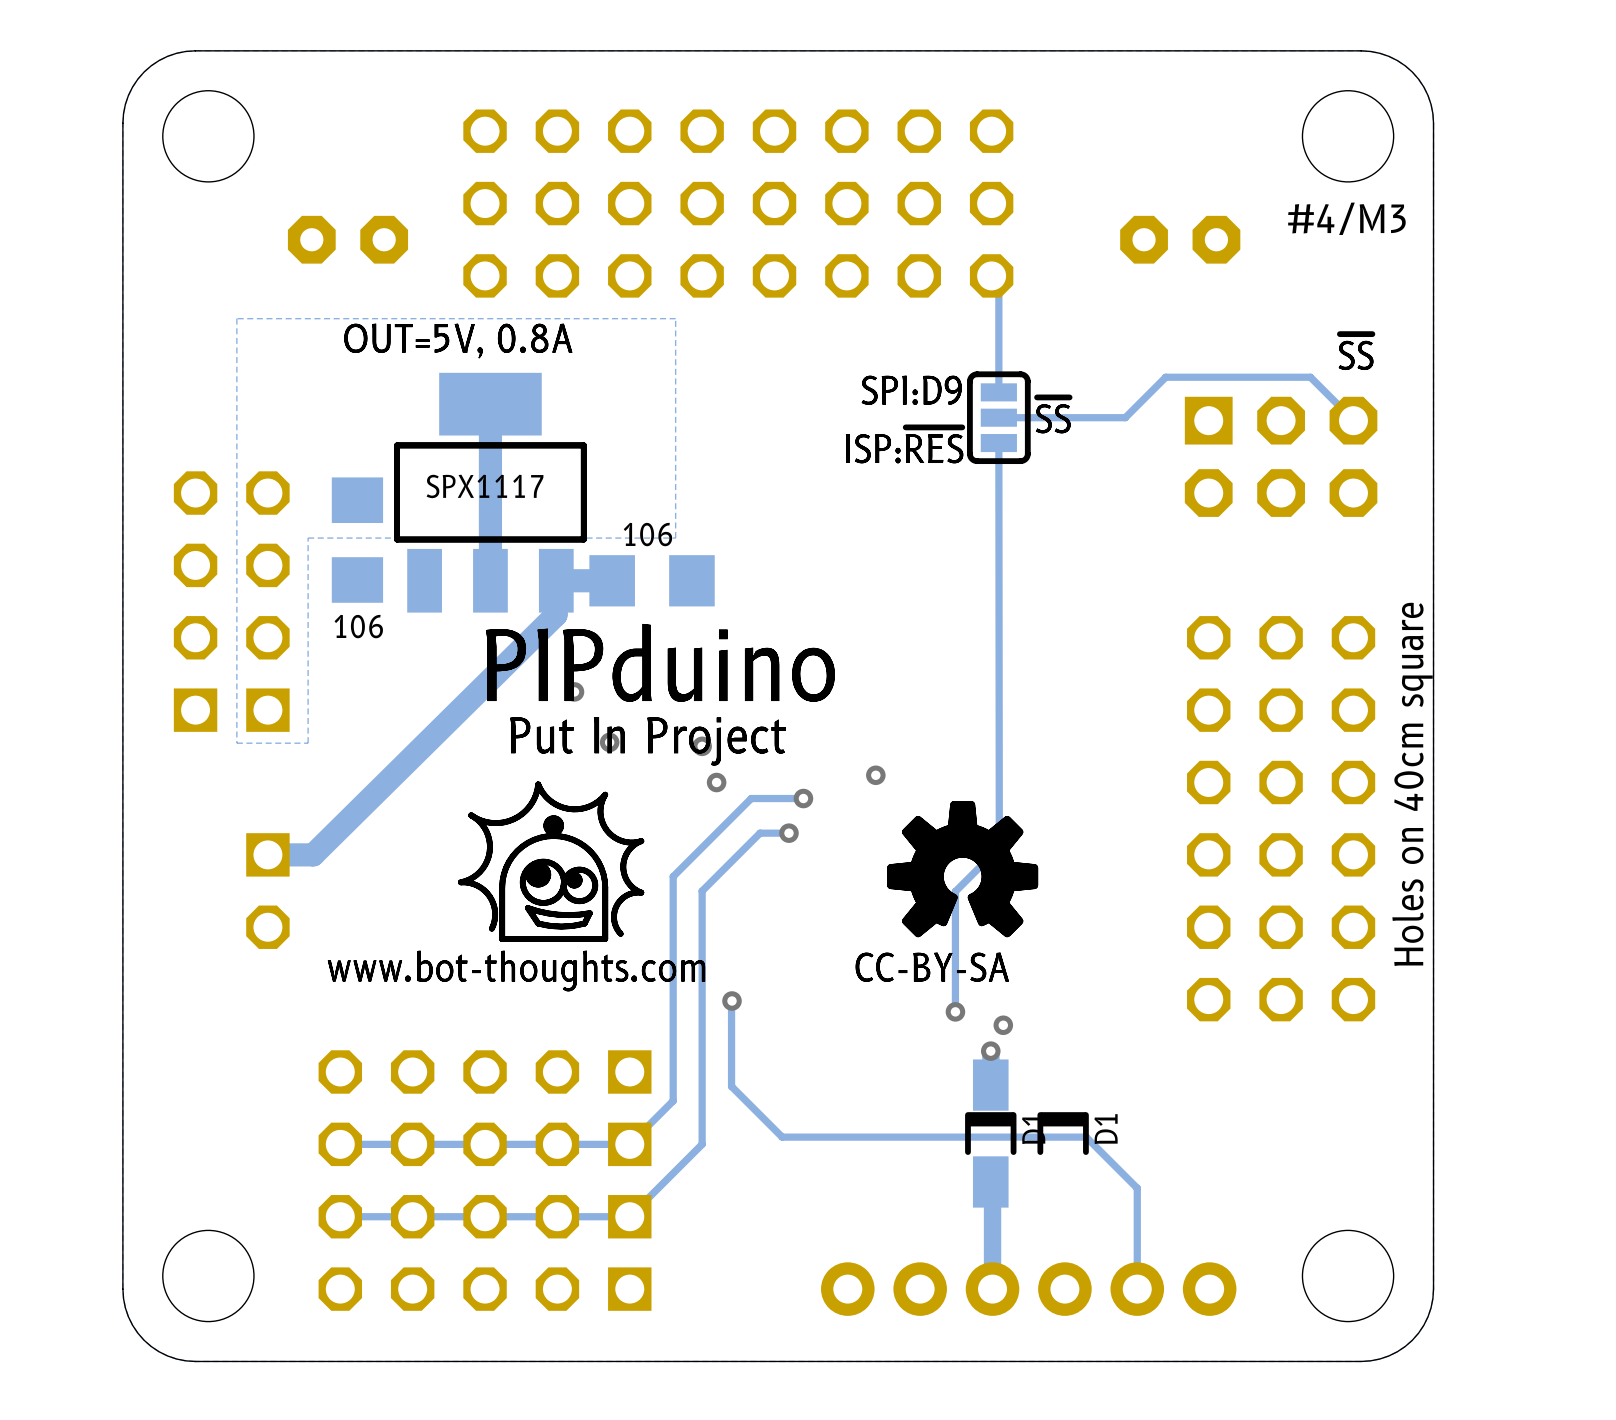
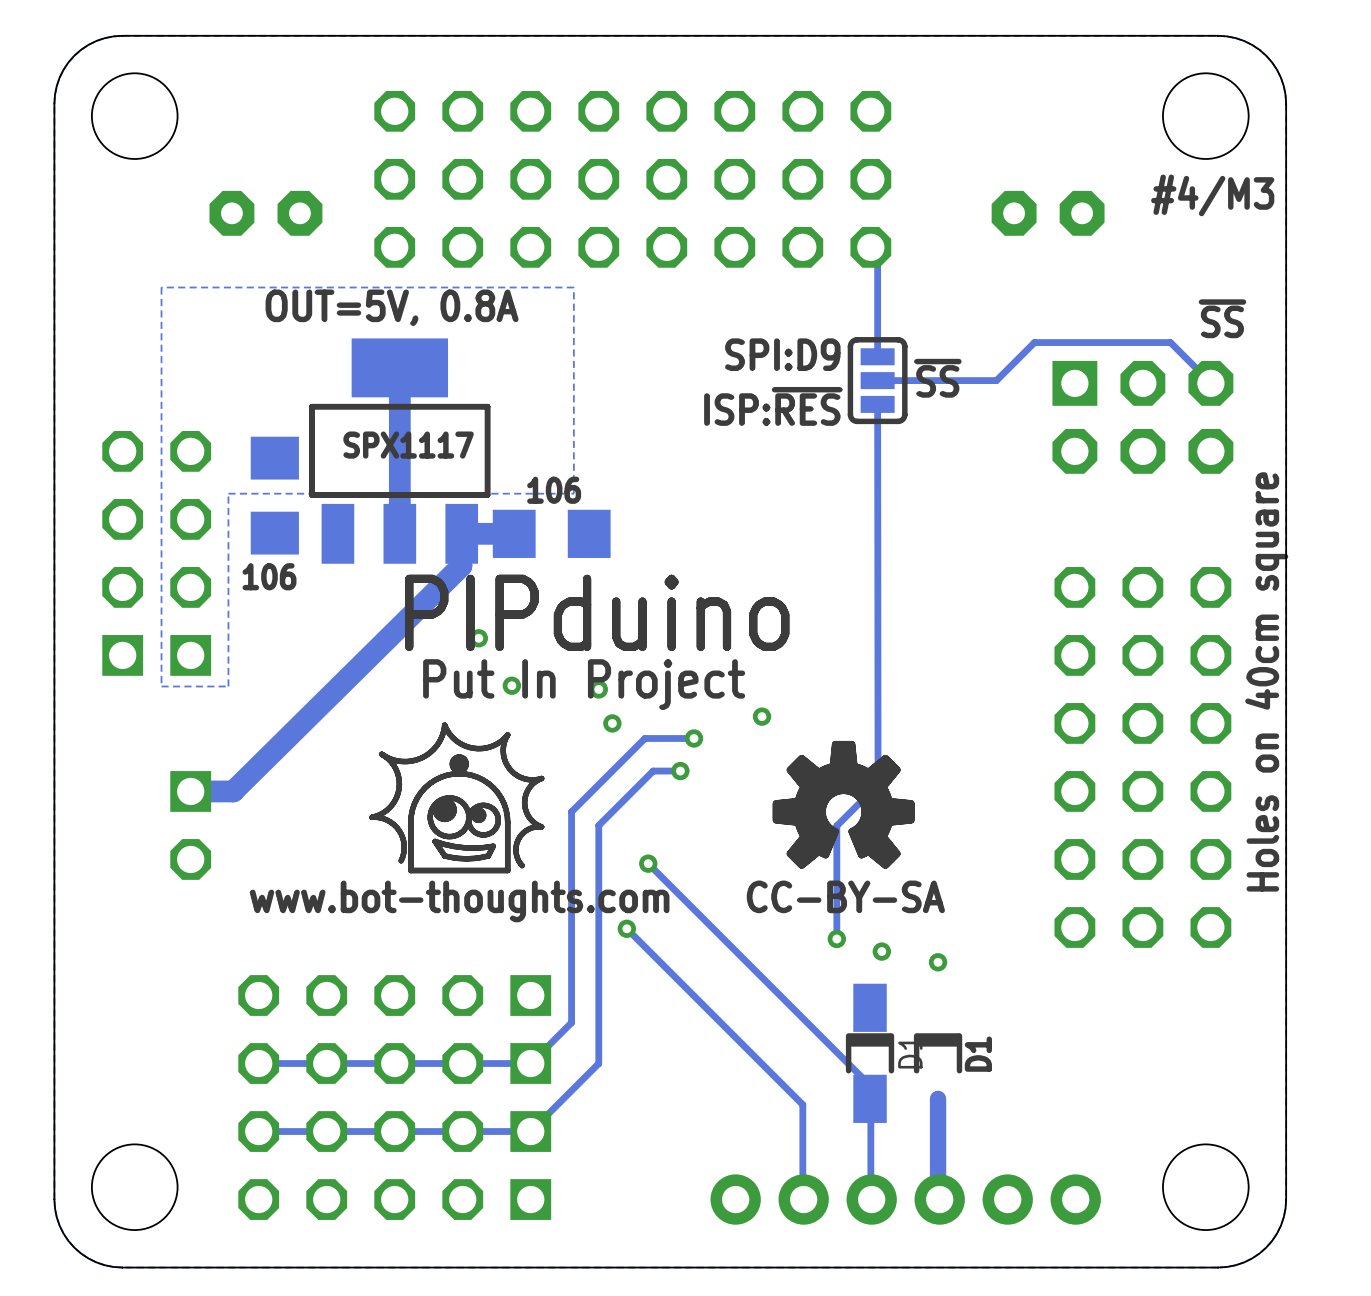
via: none -> (648, 863)
track: (732, 1000) (731, 1086) (782, 1137) (1086, 1137) (1137, 1188) (1137, 1289) -> (626, 928) (802, 1104) (802, 1199)
via position: (990, 1051) -> (938, 962)
track: (990, 1181) (992, 1181) (992, 1289) -> (648, 863) (870, 1086) (870, 1199)
track: none -> (938, 1098) (938, 1199)

